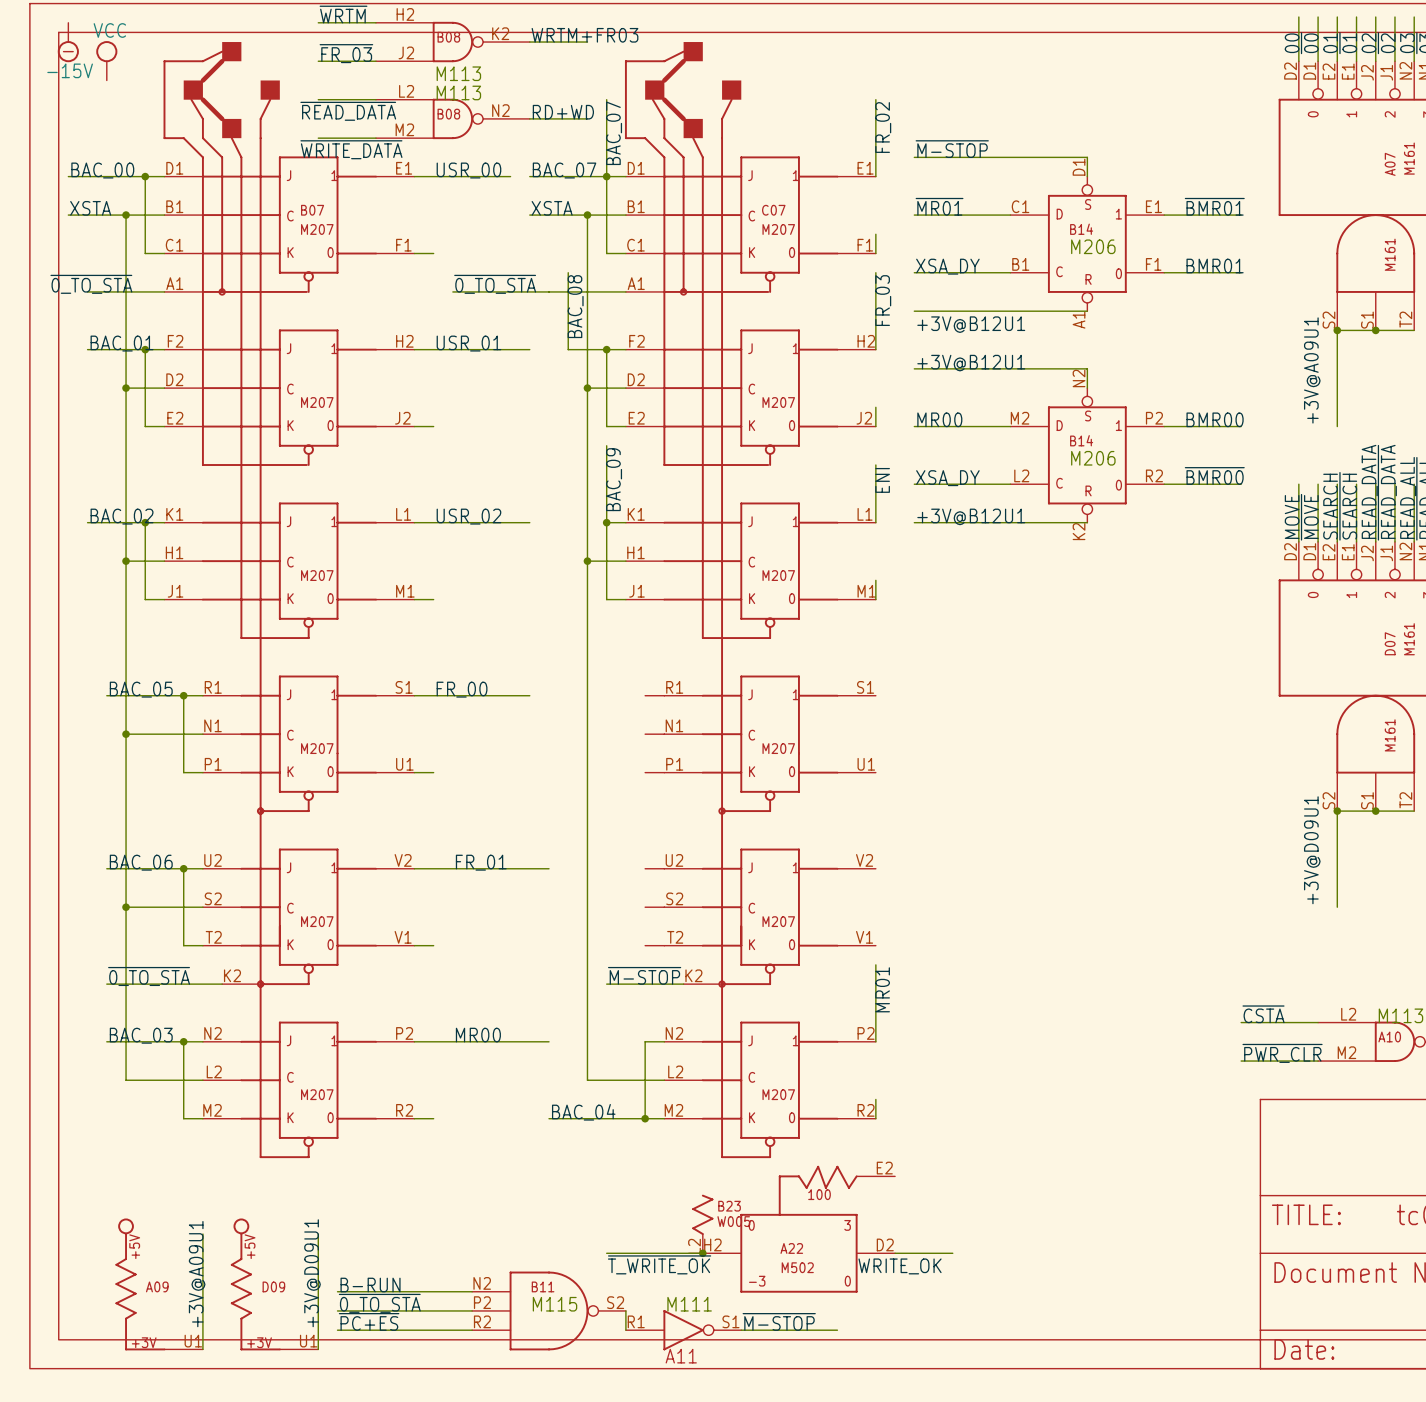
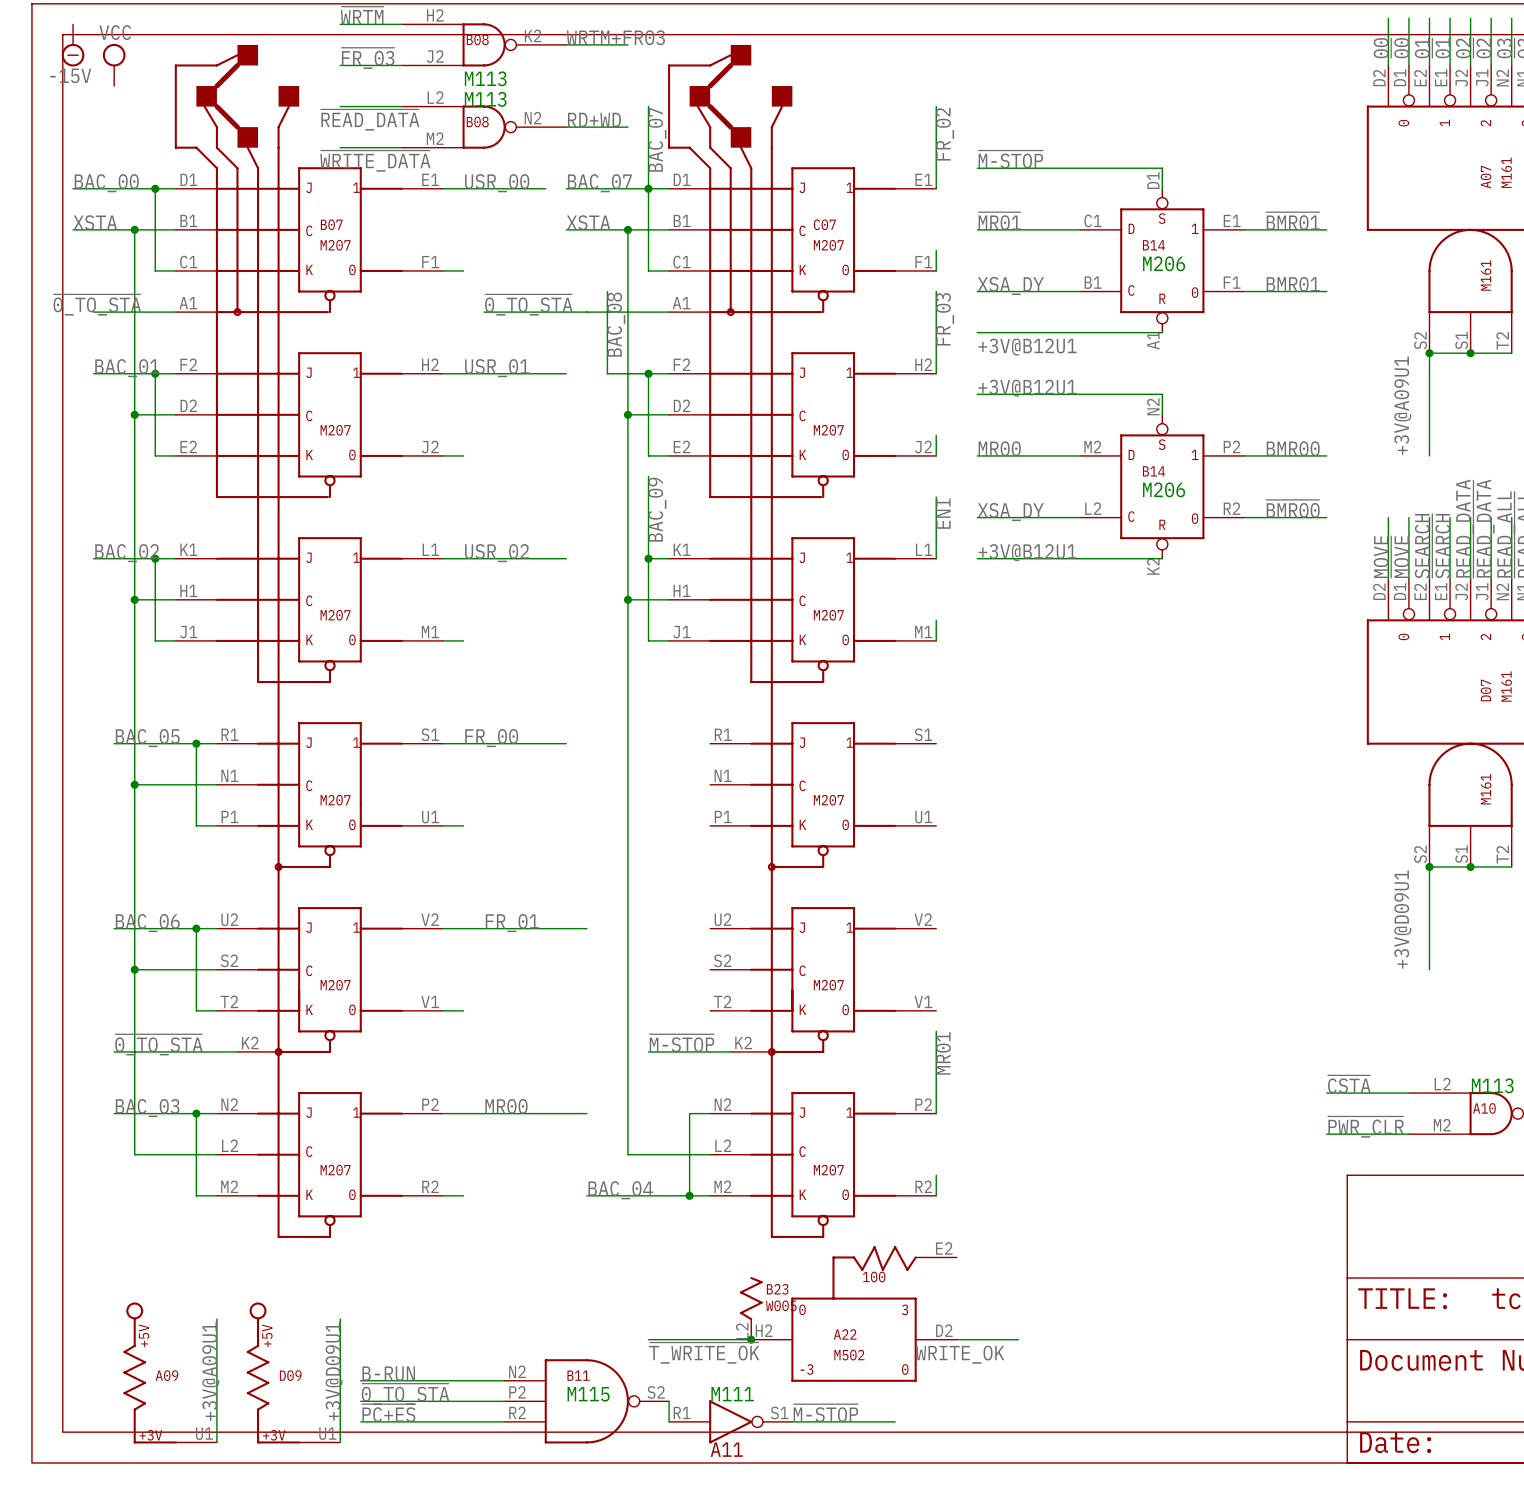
power symbol: (654, 695) -> none
power symbol: (654, 734) -> none
power symbol: (654, 772) -> none
power symbol: (654, 868) -> none
power symbol: (654, 907) -> none
power symbol: (654, 945) -> none

